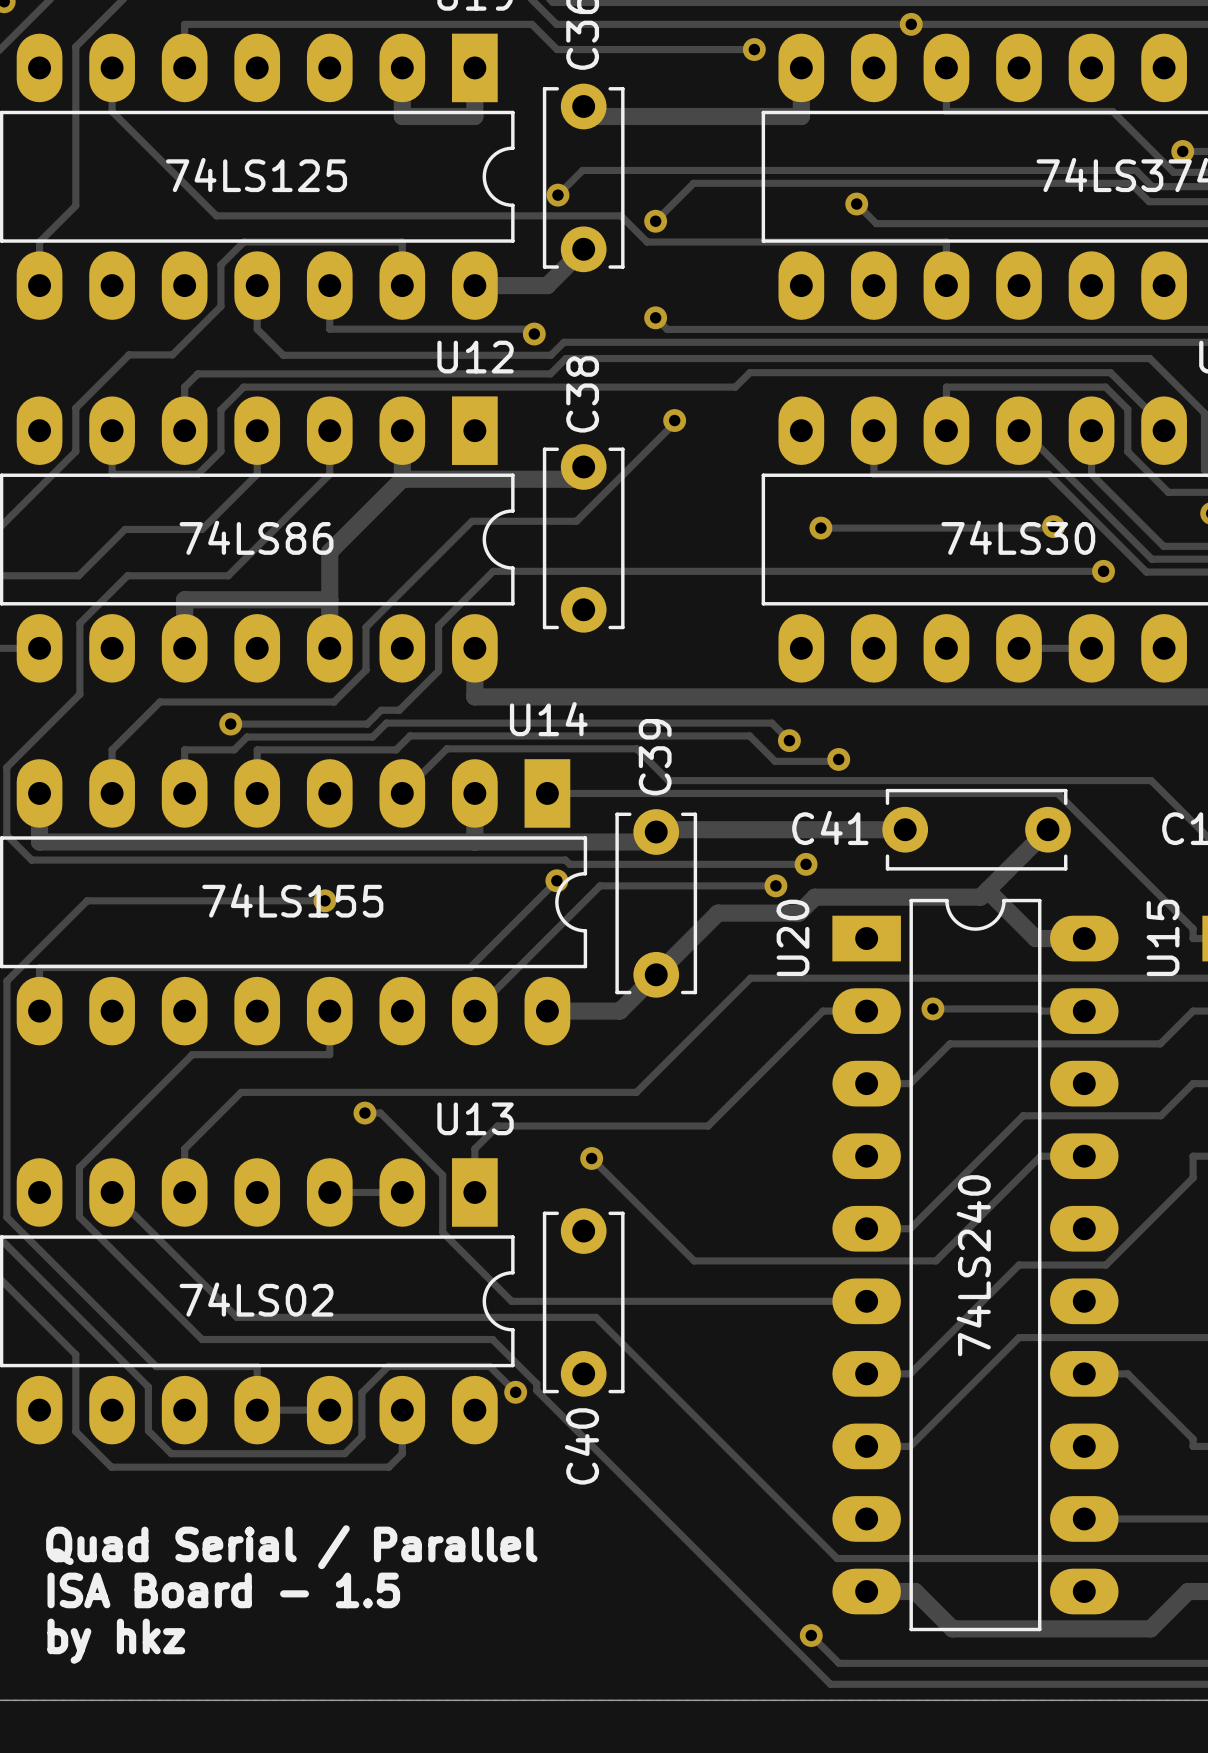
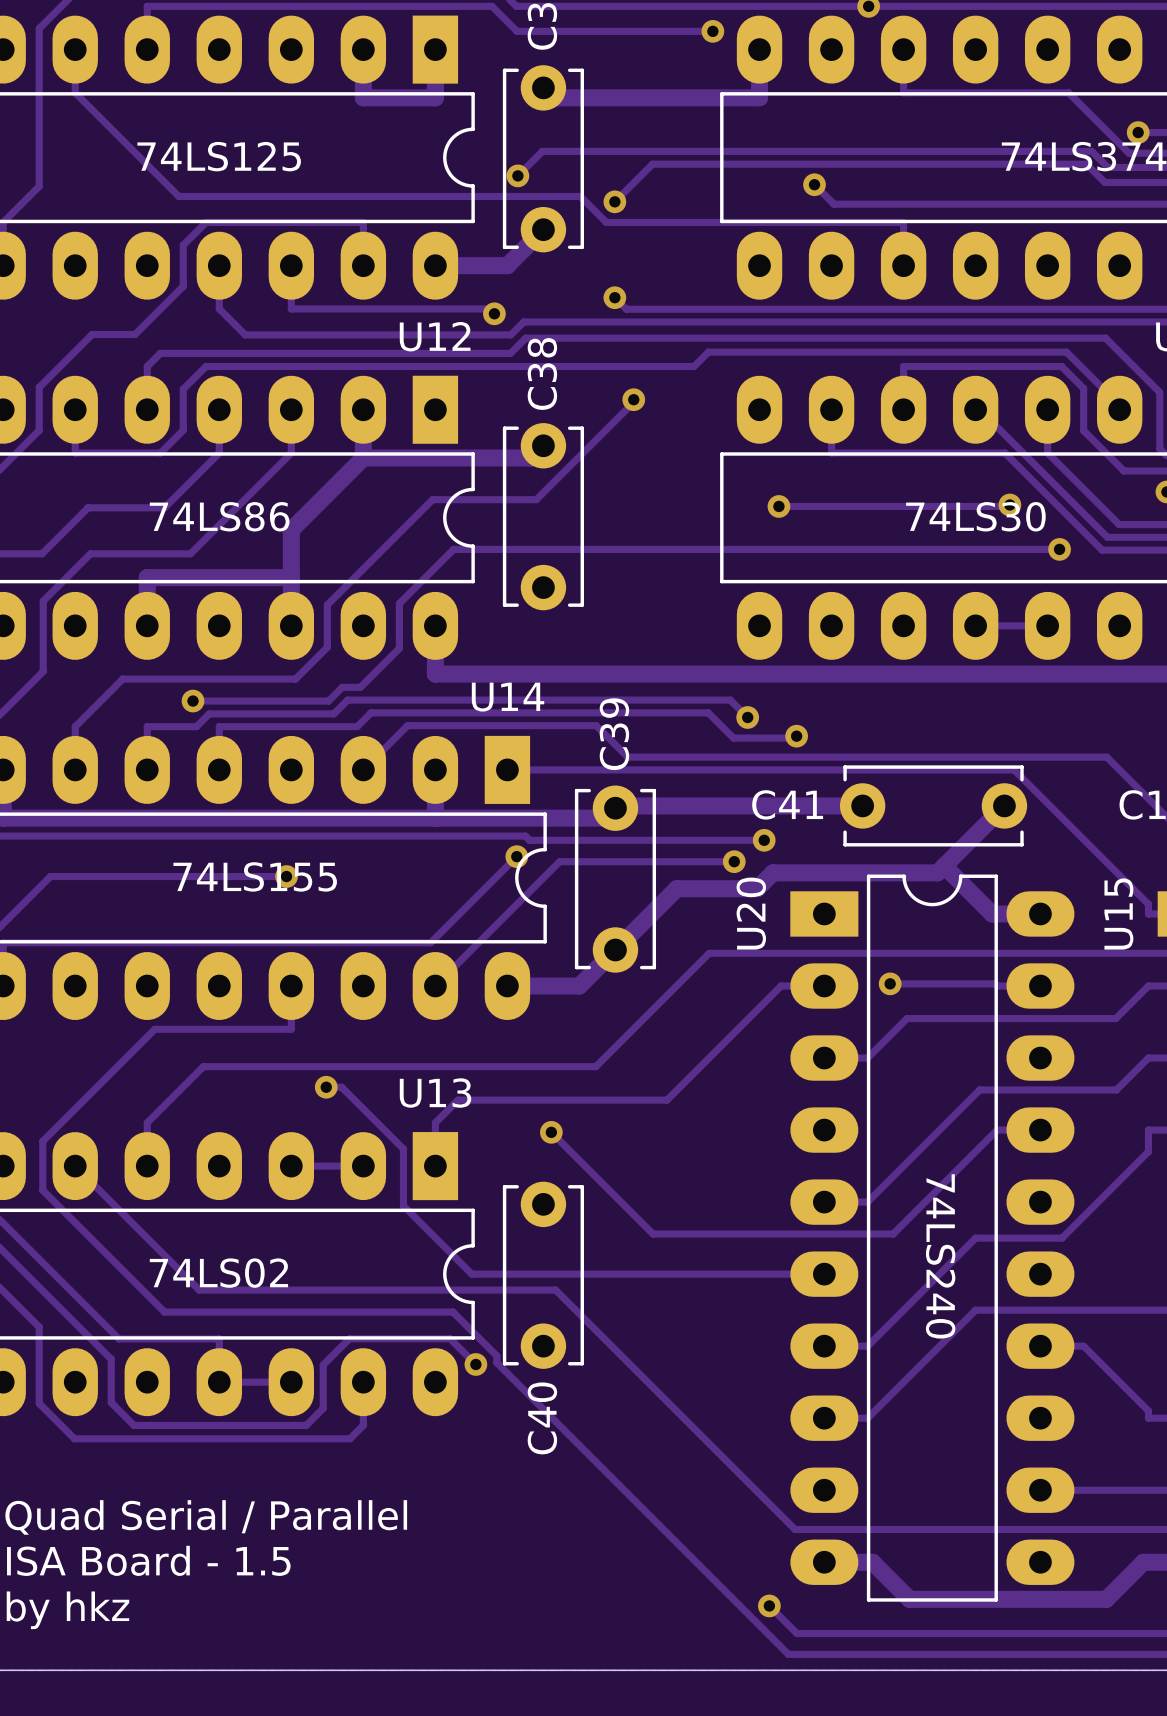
text rotation: 0° (973, 1265) -> 180° (940, 1256)

